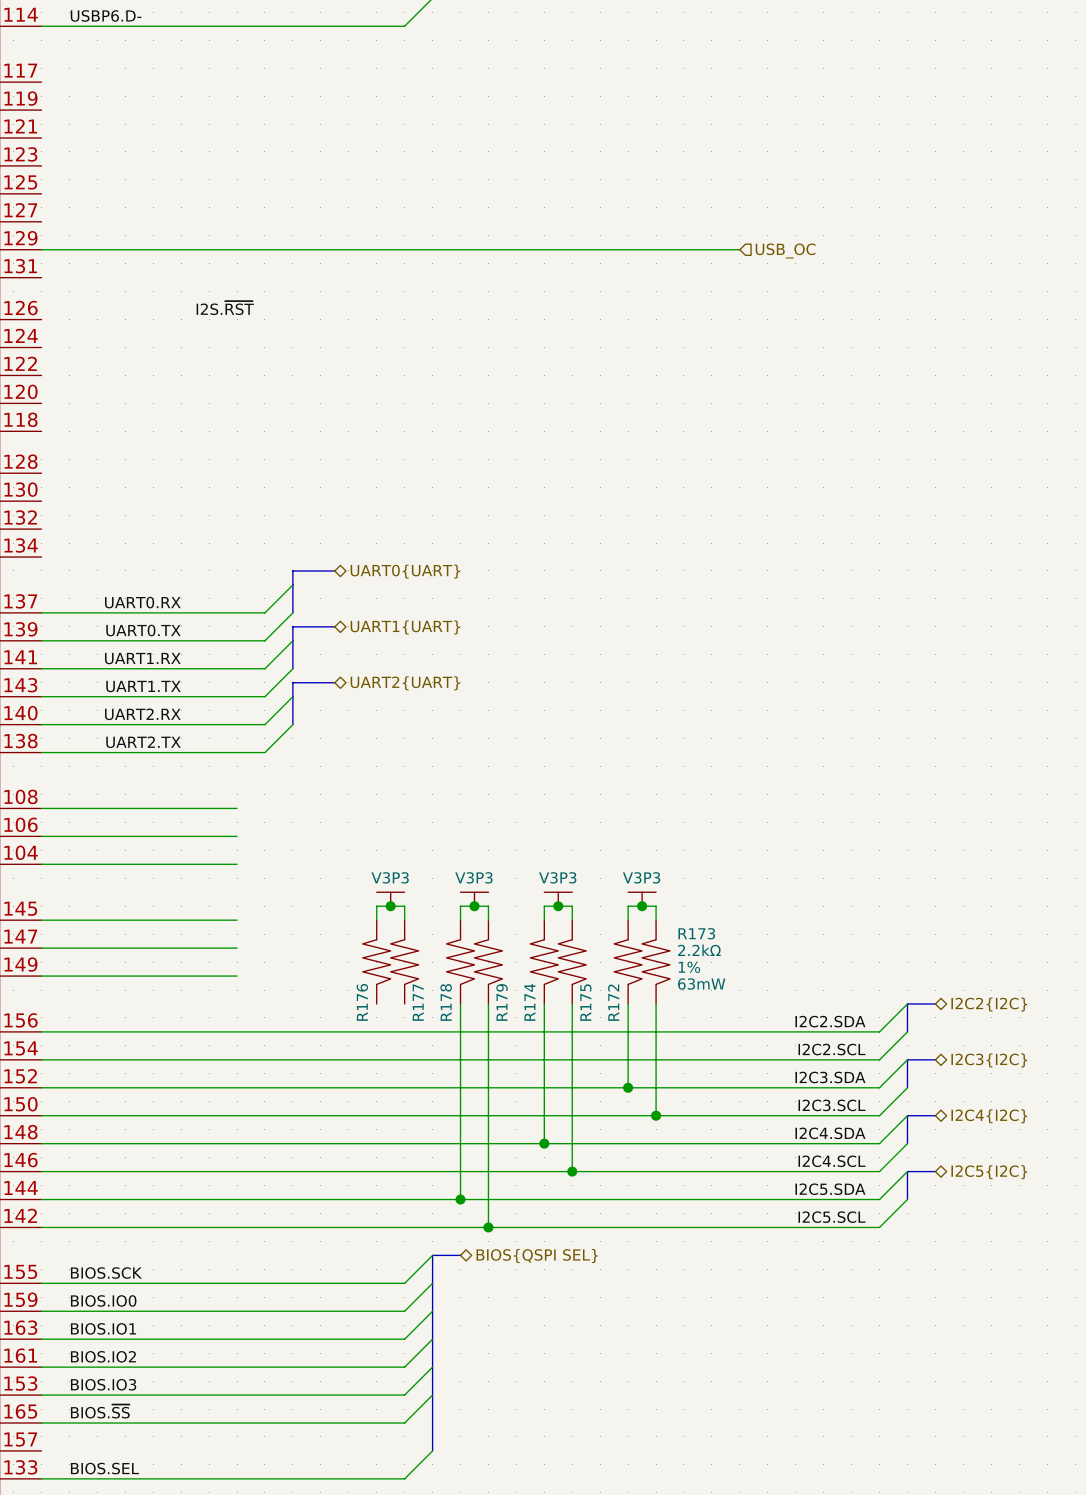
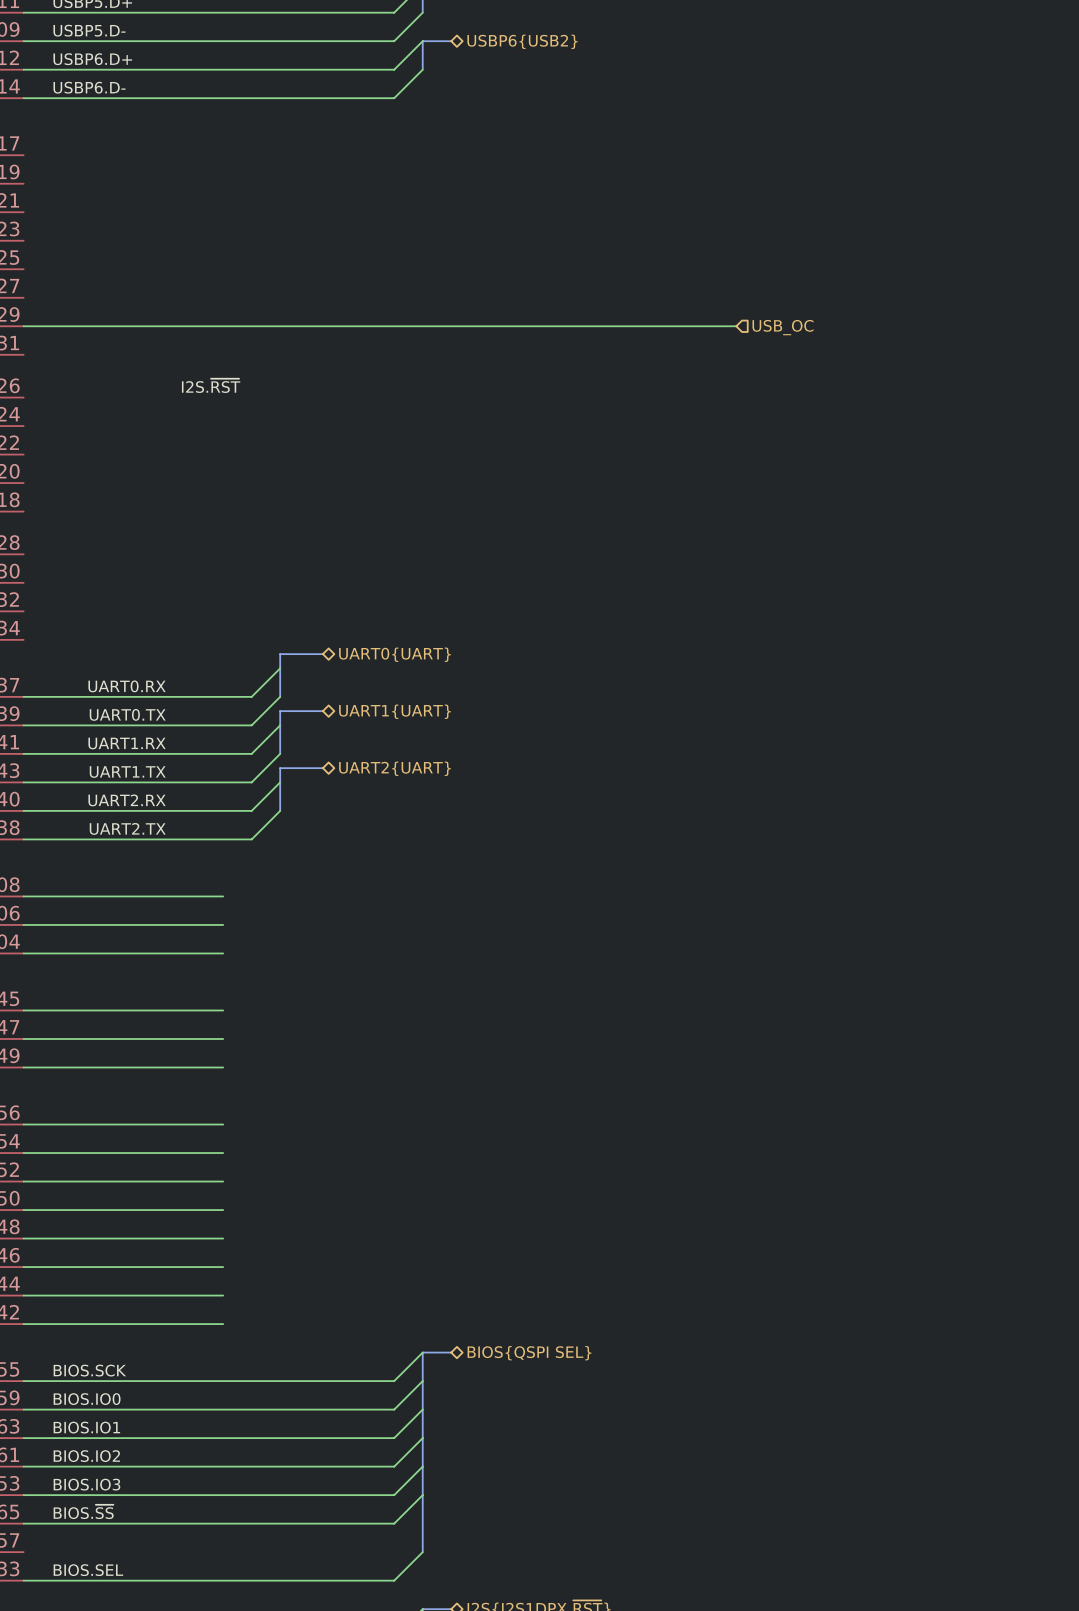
power symbol: V3P3 (390, 899) -> none
power symbol: V3P3 (474, 899) -> none
power symbol: V3P3 (558, 899) -> none
power symbol: V3P3 (642, 899) -> none
junction: (390, 906) -> none
junction: (474, 906) -> none
junction: (558, 906) -> none
junction: (642, 906) -> none
wire: (376, 920) (376, 906) (404, 906) (404, 920) -> none
wire: (460, 920) (460, 906) (488, 906) (488, 920) -> none
wire: (544, 920) (544, 906) (572, 906) (572, 920) -> none
wire: (628, 920) (628, 906) (656, 906) (656, 920) -> none
R176: (376, 962) -> none
R177: (404, 962) -> none
R178: (460, 962) -> none
R179: (488, 962) -> none
R174: (544, 962) -> none
R175: (572, 962) -> none
R172: (628, 962) -> none
R173: (656, 962) -> none
wire: (460, 1003) (460, 1199) -> none
wire: (488, 1003) (488, 1227) -> none
wire: (544, 1003) (544, 1143) -> none
wire: (572, 1003) (572, 1171) -> none
wire: (628, 1003) (628, 1087) -> none
wire: (656, 1003) (656, 1115) -> none
wire: (907, 1003) (879, 1031) (237, 1031) -> none
bus: (935, 1003) (907, 1003) (907, 1031) -> none
hierarchical label: I2C2{I2C} (989, 1004) -> none
label: I2C2.SDA (830, 1021) -> none
wire: (907, 1031) (879, 1059) (237, 1059) -> none
label: I2C2.SCL (832, 1049) -> none
wire: (907, 1059) (879, 1087) (237, 1087) -> none
bus: (935, 1059) (907, 1059) (907, 1087) -> none
hierarchical label: I2C3{I2C} (989, 1060) -> none
label: I2C3.SDA (830, 1077) -> none
junction: (628, 1087) -> none
wire: (907, 1087) (879, 1115) (237, 1115) -> none
label: I2C3.SCL (832, 1105) -> none
junction: (656, 1115) -> none
wire: (907, 1115) (879, 1143) (237, 1143) -> none
bus: (935, 1115) (907, 1115) (907, 1143) -> none
hierarchical label: I2C4{I2C} (989, 1116) -> none
label: I2C4.SDA (830, 1133) -> none
junction: (544, 1143) -> none
wire: (907, 1143) (879, 1171) (237, 1171) -> none
label: I2C4.SCL (832, 1161) -> none
junction: (572, 1171) -> none
wire: (907, 1171) (879, 1199) (237, 1199) -> none
bus: (935, 1171) (907, 1171) (907, 1199) -> none
hierarchical label: I2C5{I2C} (989, 1172) -> none
label: I2C5.SDA (830, 1189) -> none
junction: (460, 1199) -> none
wire: (907, 1199) (879, 1227) (237, 1227) -> none
label: I2C5.SCL (832, 1217) -> none
junction: (488, 1227) -> none

